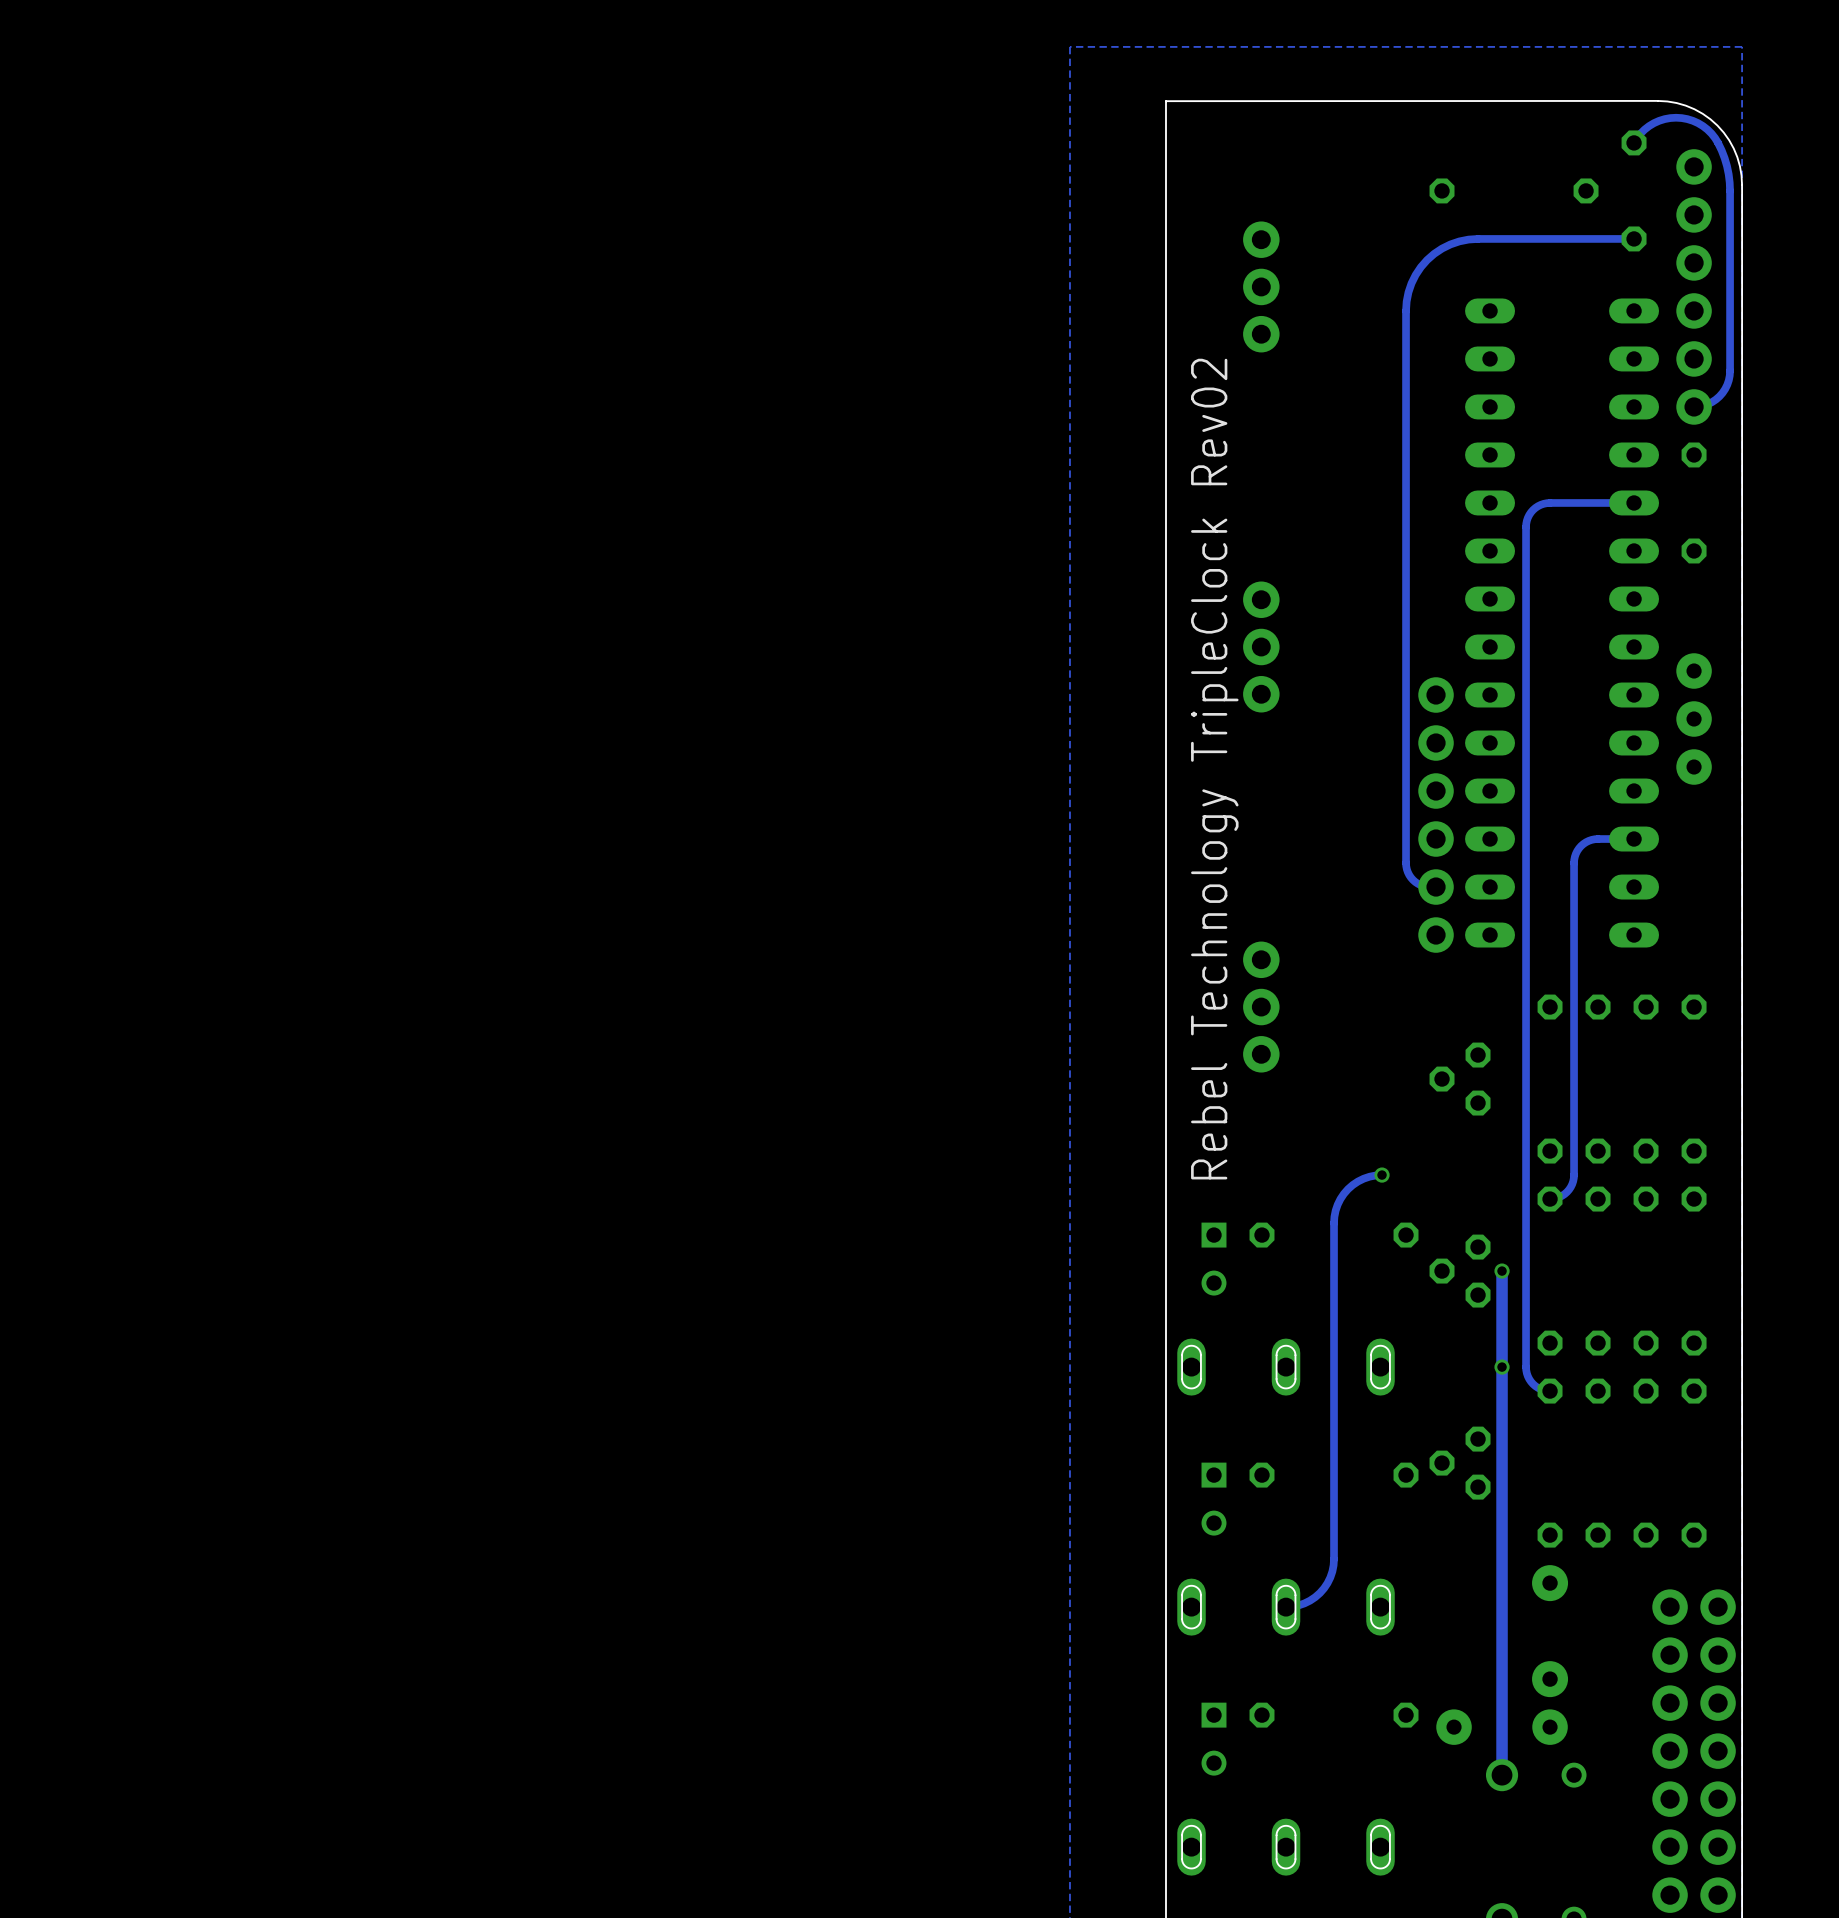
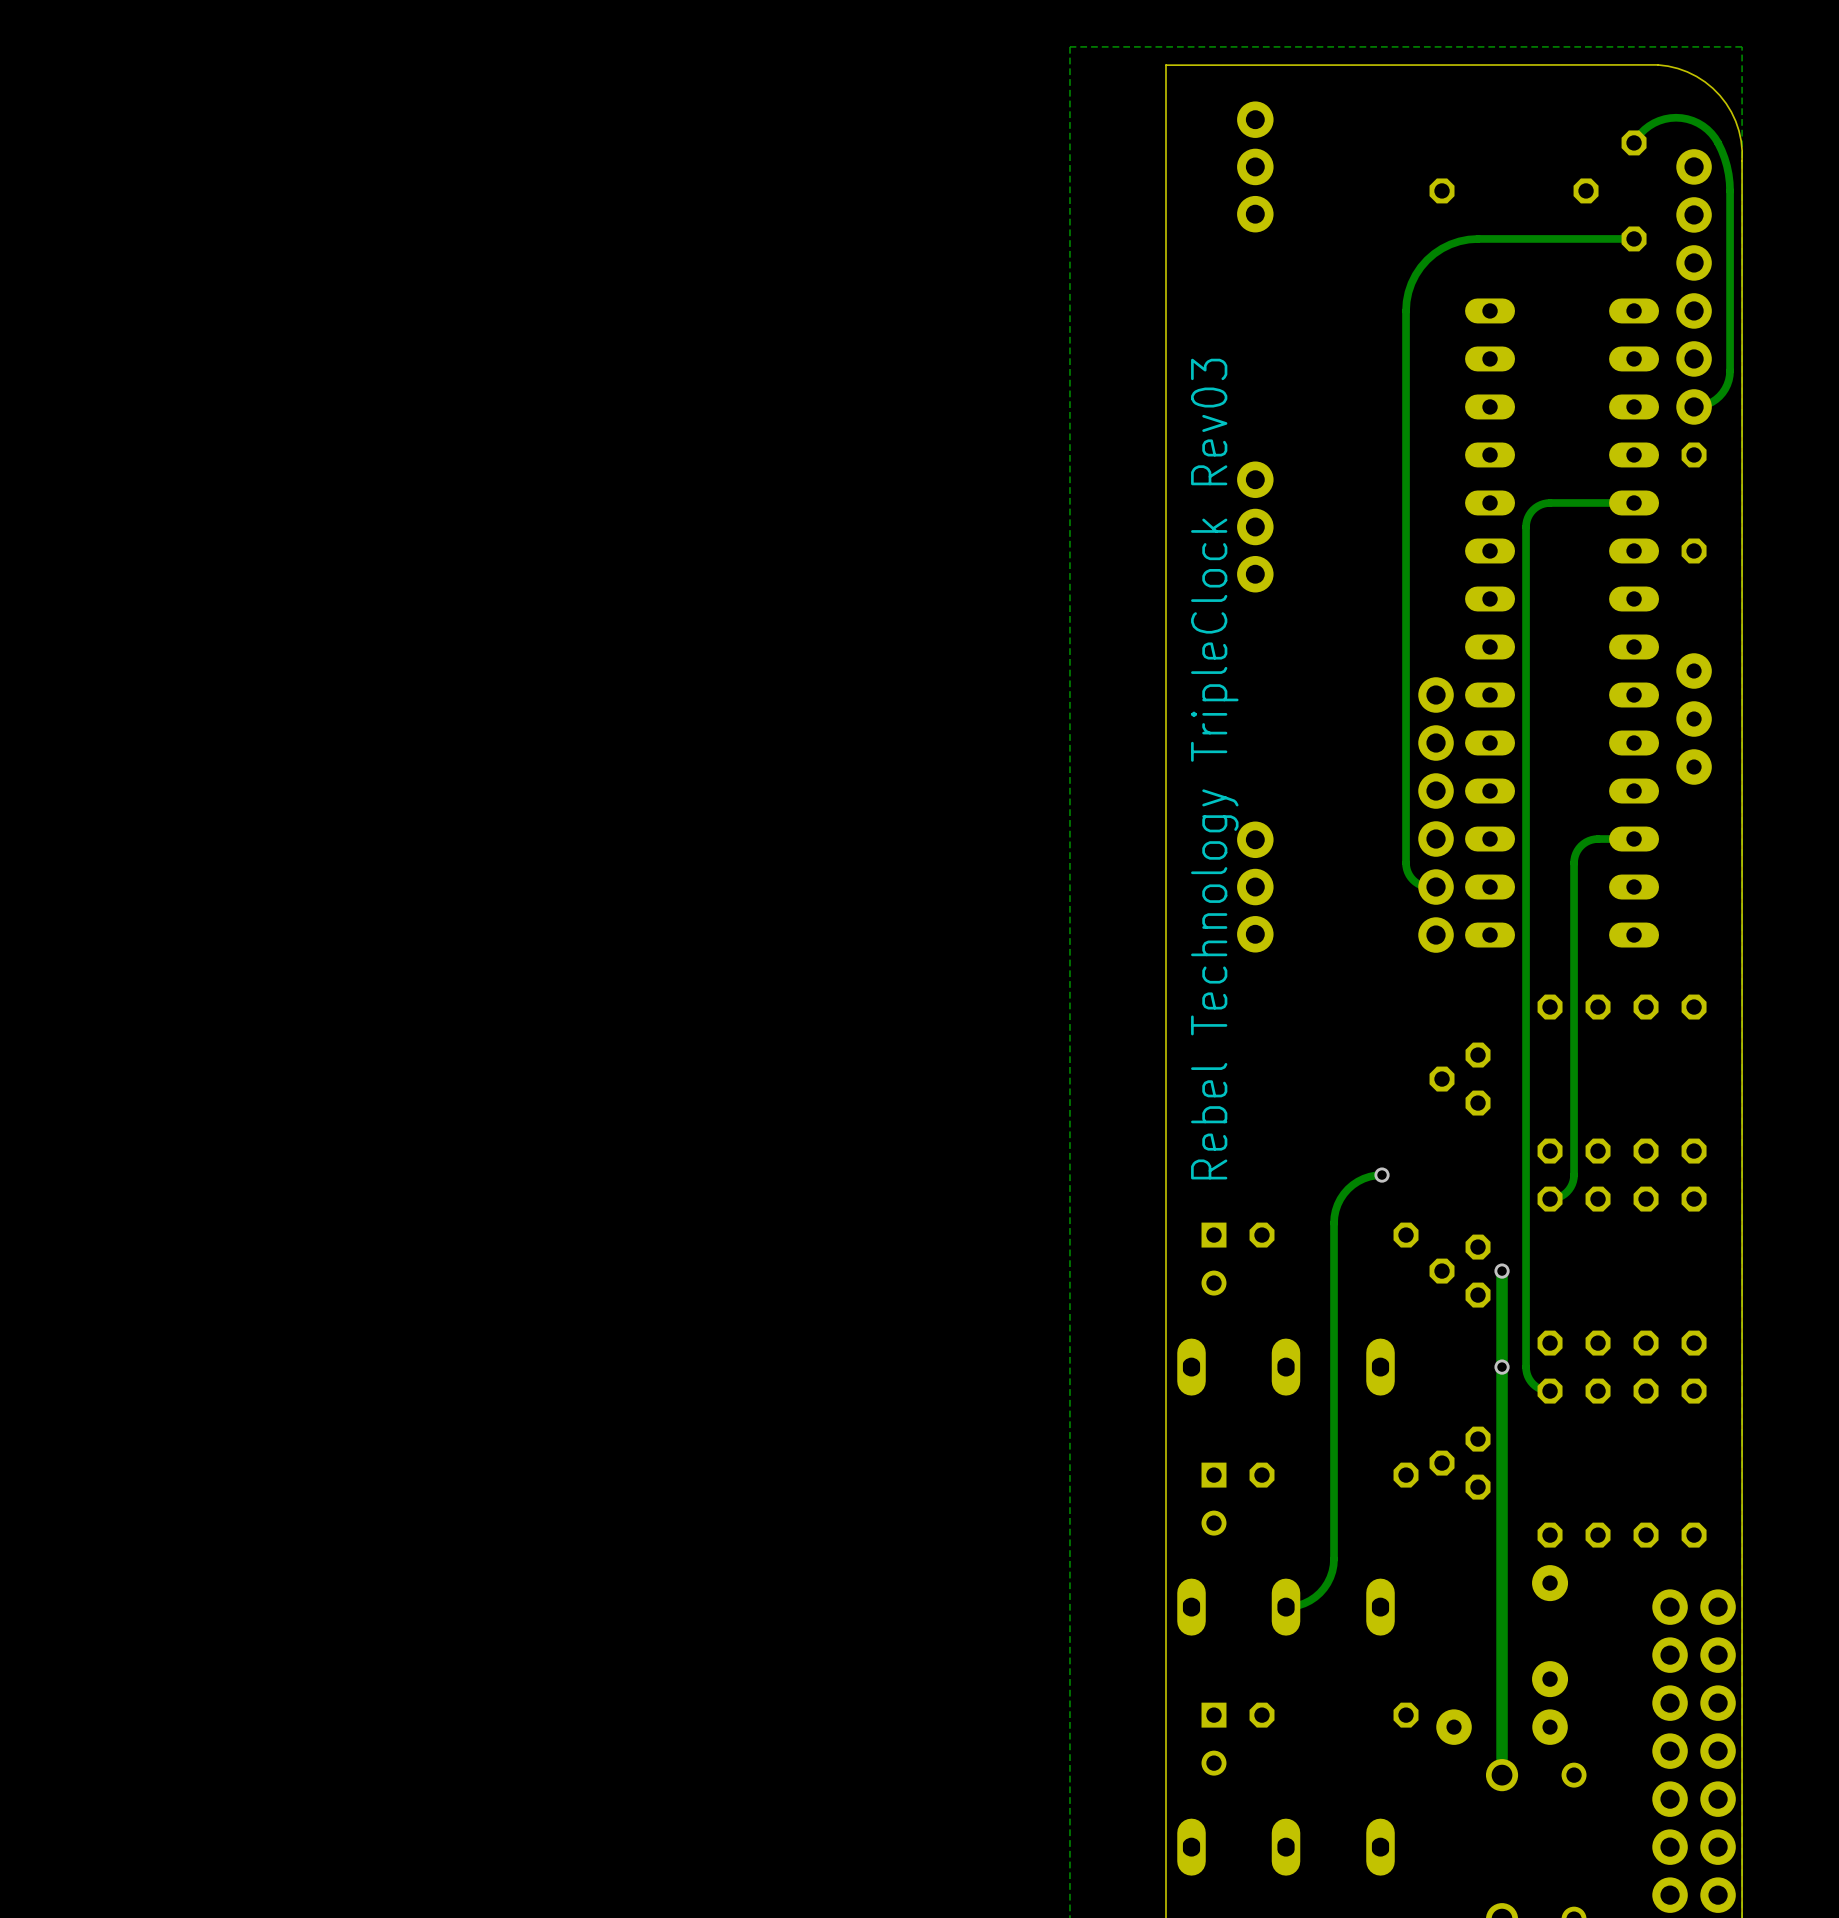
board edge: (1165, 101) (1667, 101) (1694, 109) (1717, 125) (1729, 140) (1737, 157) (1742, 184) -> (1165, 101) (1165, 65) (1668, 66) (1687, 71) (1705, 81) (1726, 103) (1735, 121) (1741, 140) (1742, 184)
part: none -> (1255, 166)
part: (1261, 286) -> none
part: none -> (1255, 526)
part: (1261, 646) -> none
text: Rebel Technology TripleClock Rev02 (1214, 769) -> Rebel Technology TripleClock Rev03 (1214, 769)
part: none -> (1255, 887)
part: (1261, 1007) -> none

